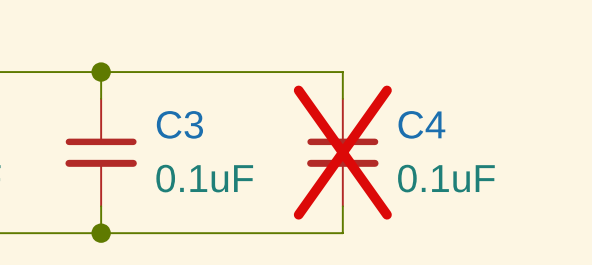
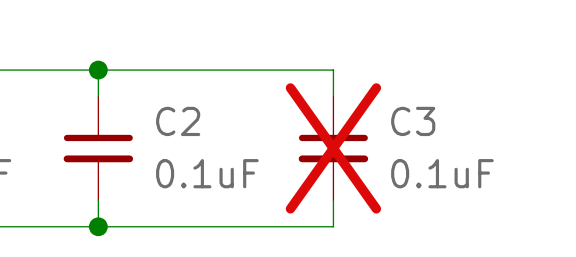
C3 name: C3 (179, 124) -> C2 (178, 121)
C4 name: C4 (421, 124) -> C3 (413, 121)

